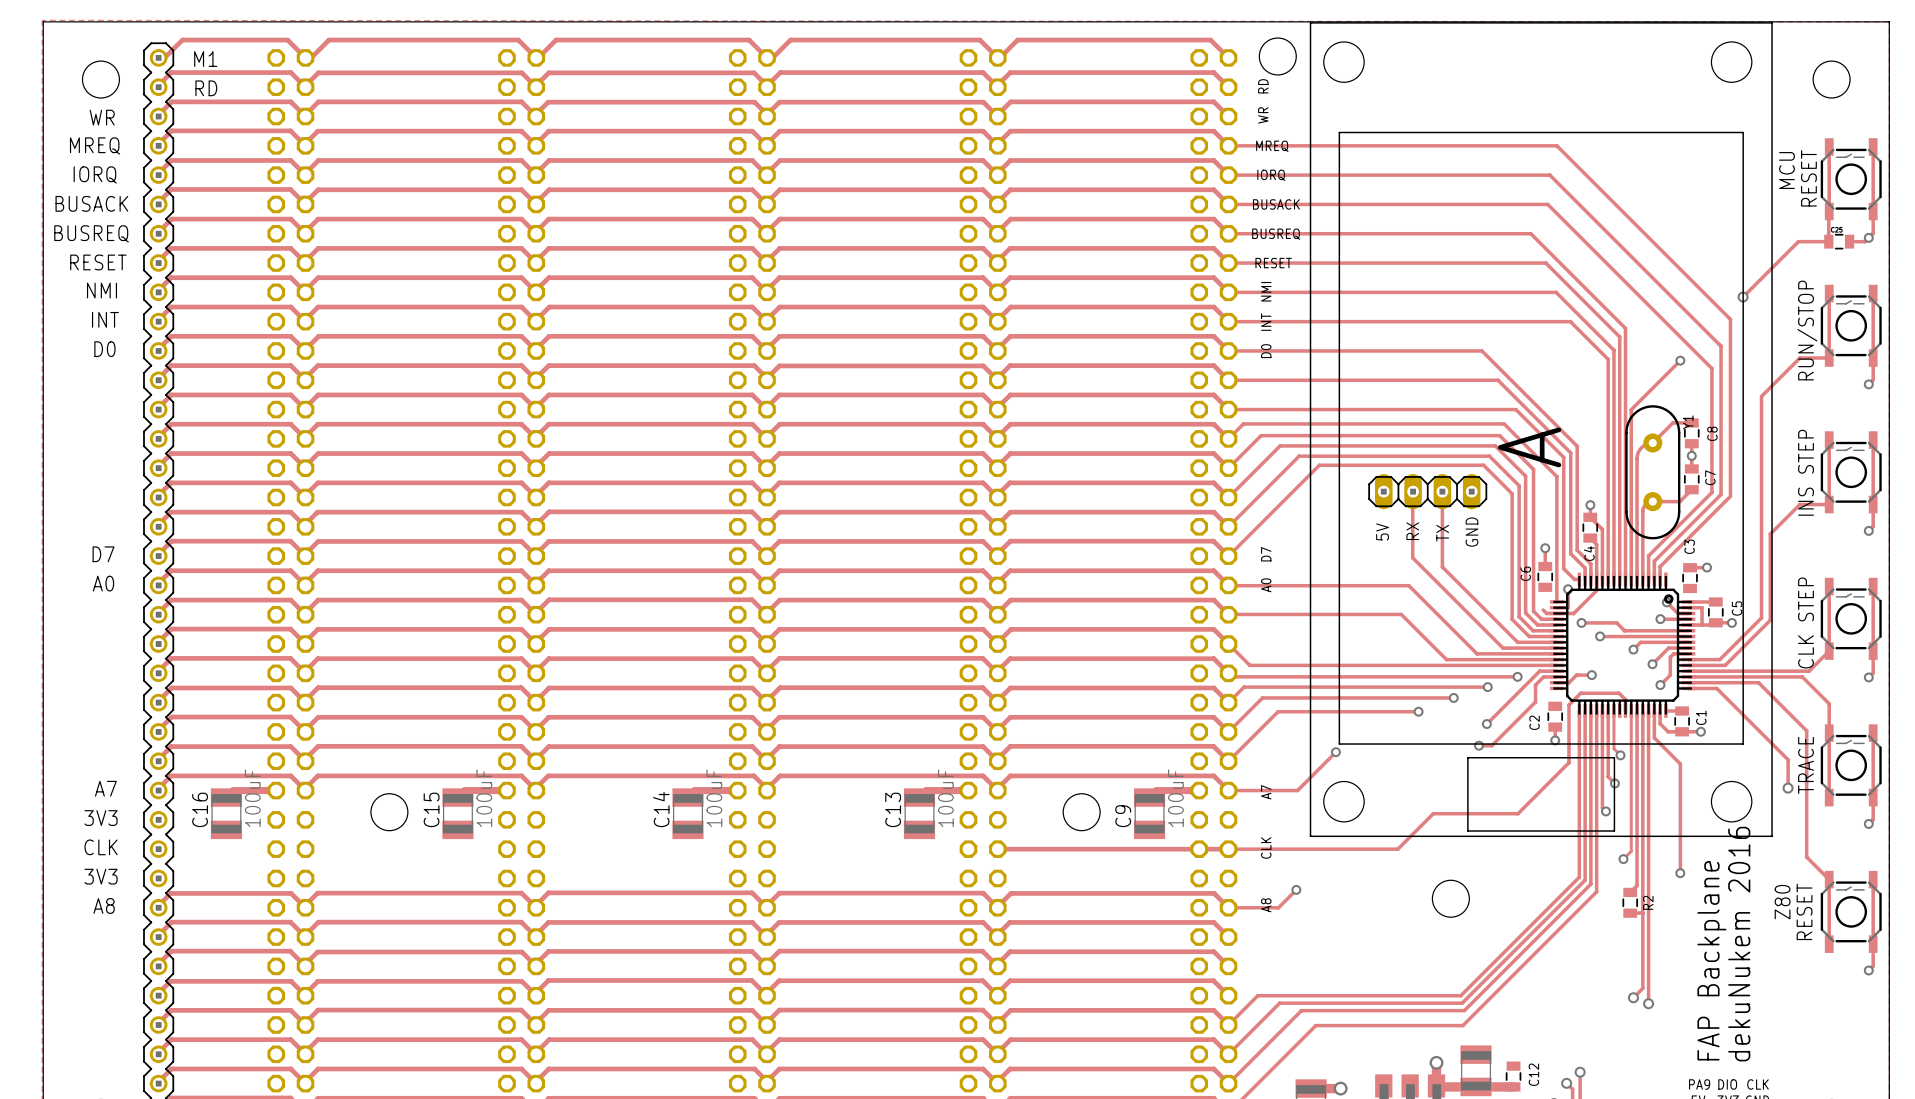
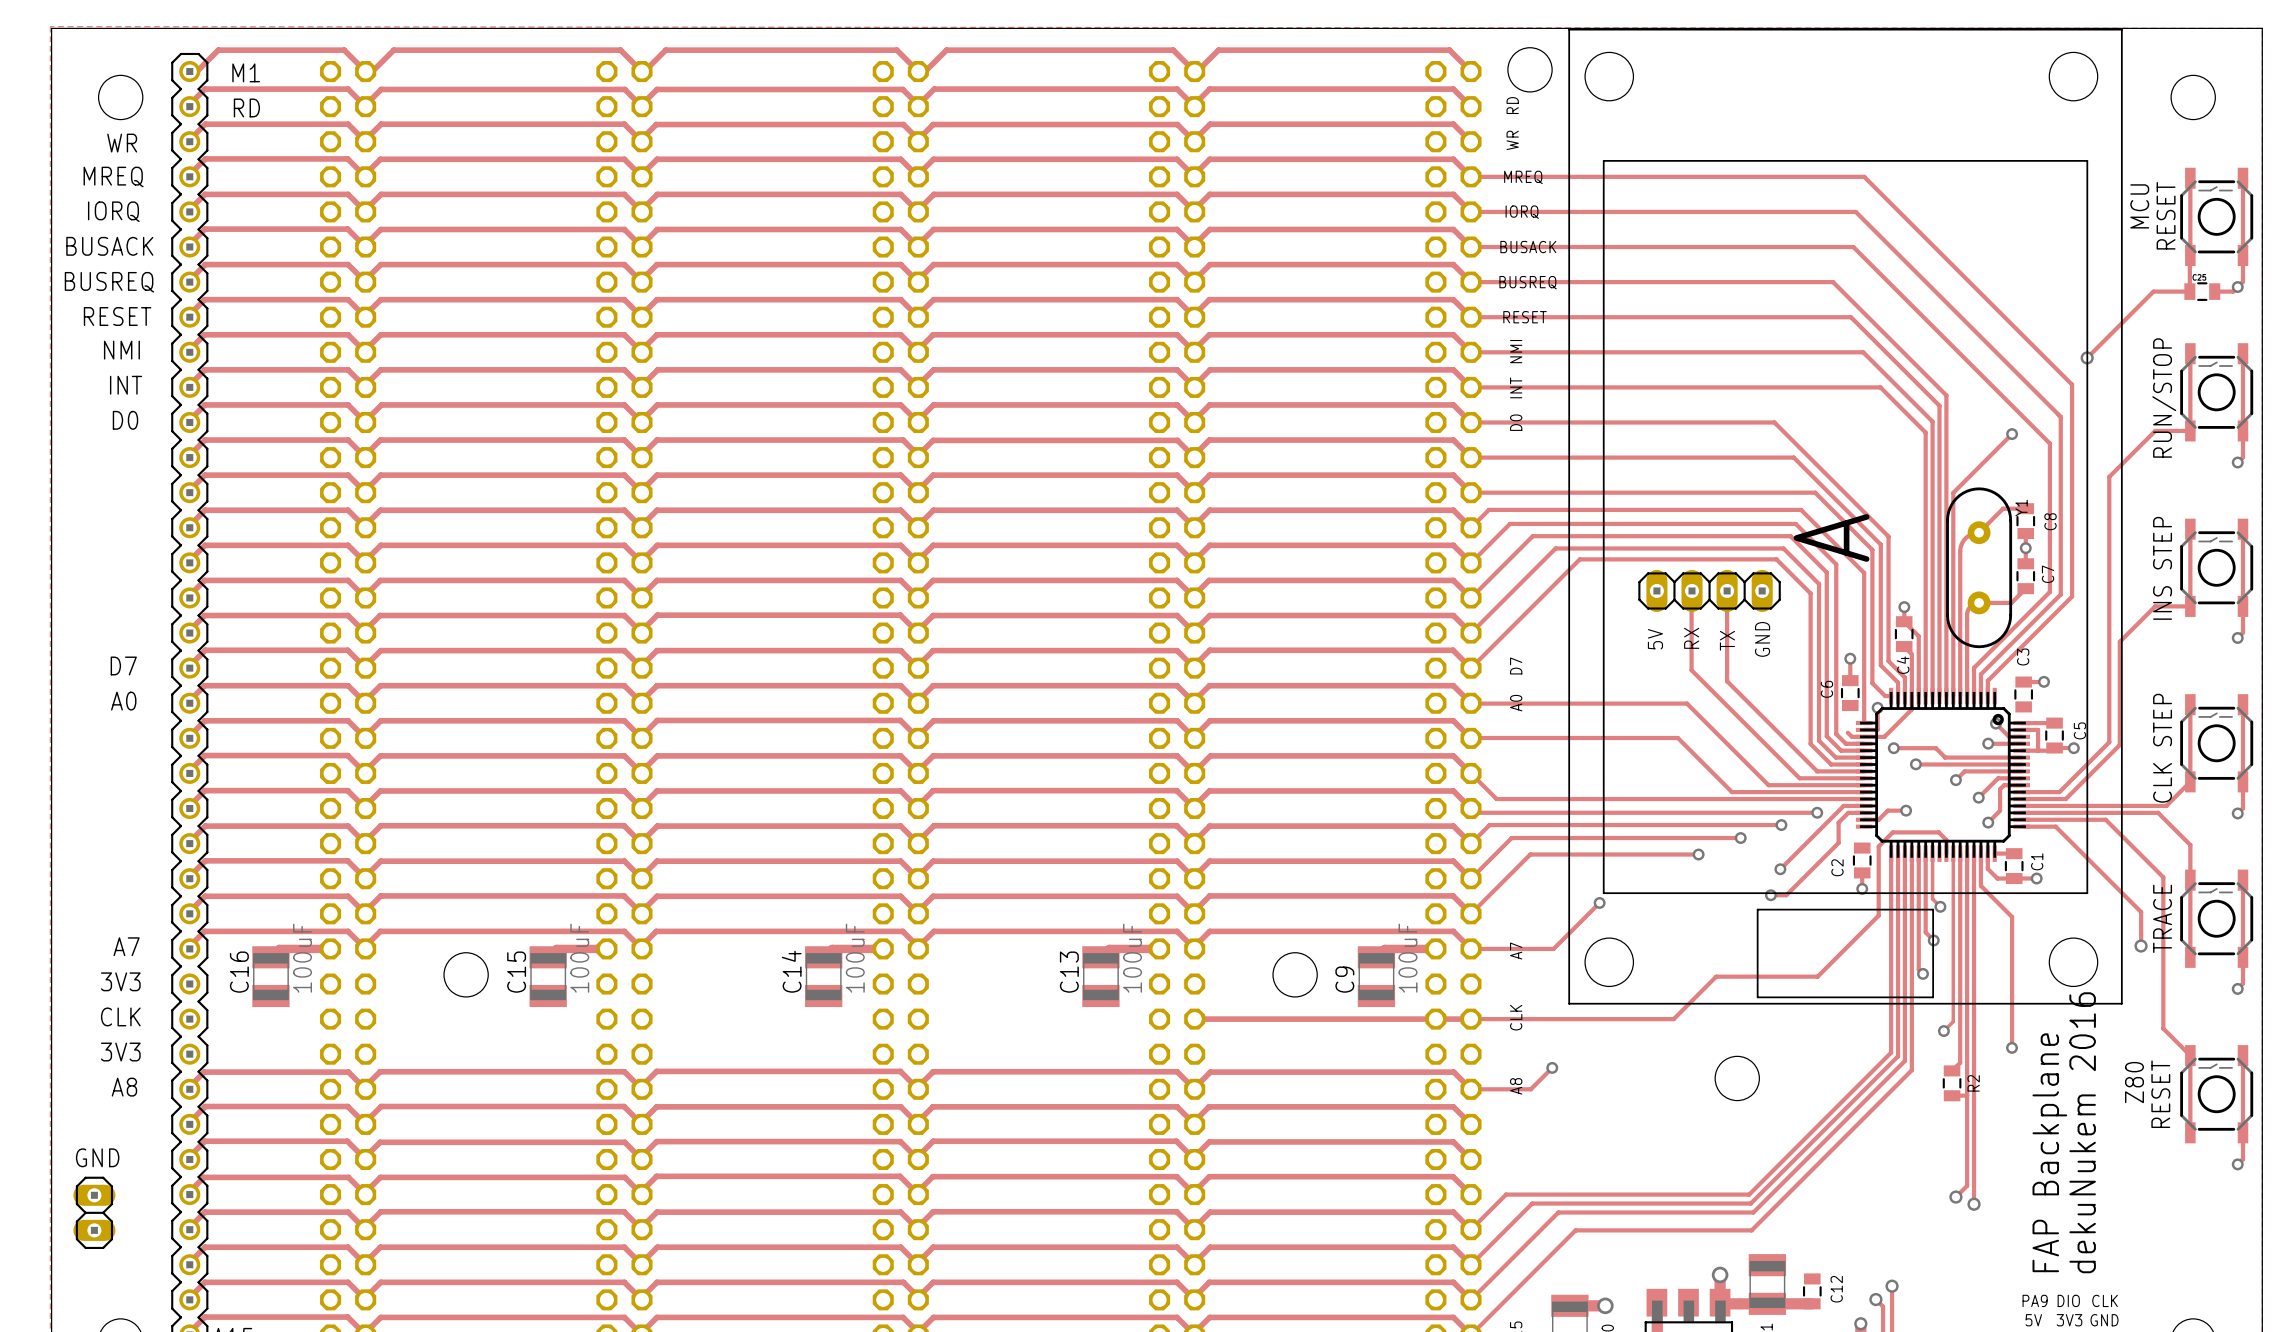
text: none -> GND (97, 1157)
part: none -> (94, 1212)

